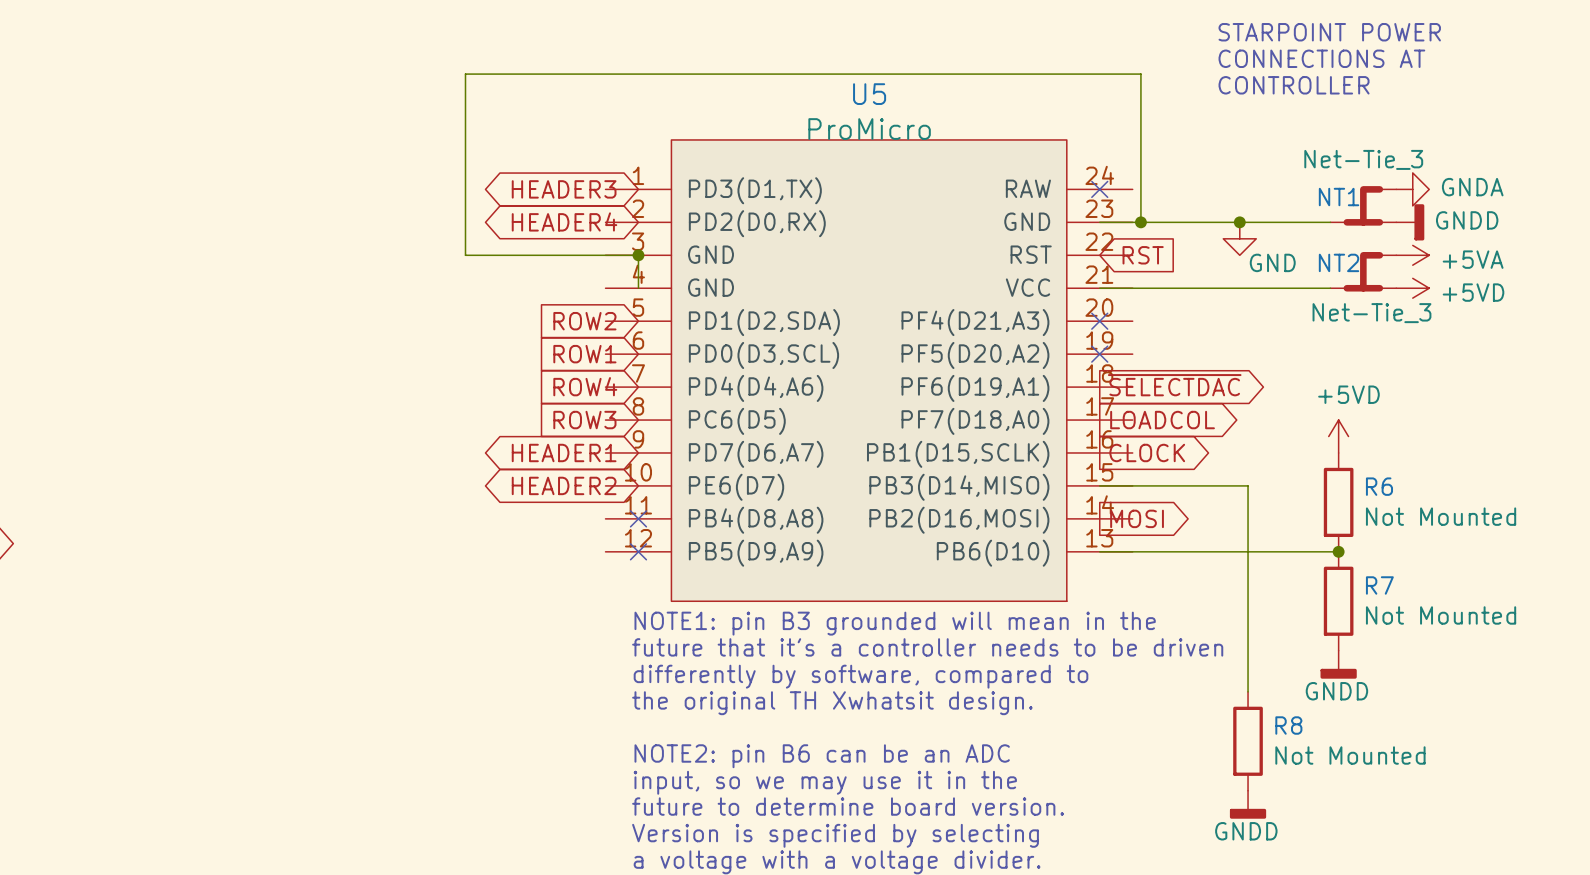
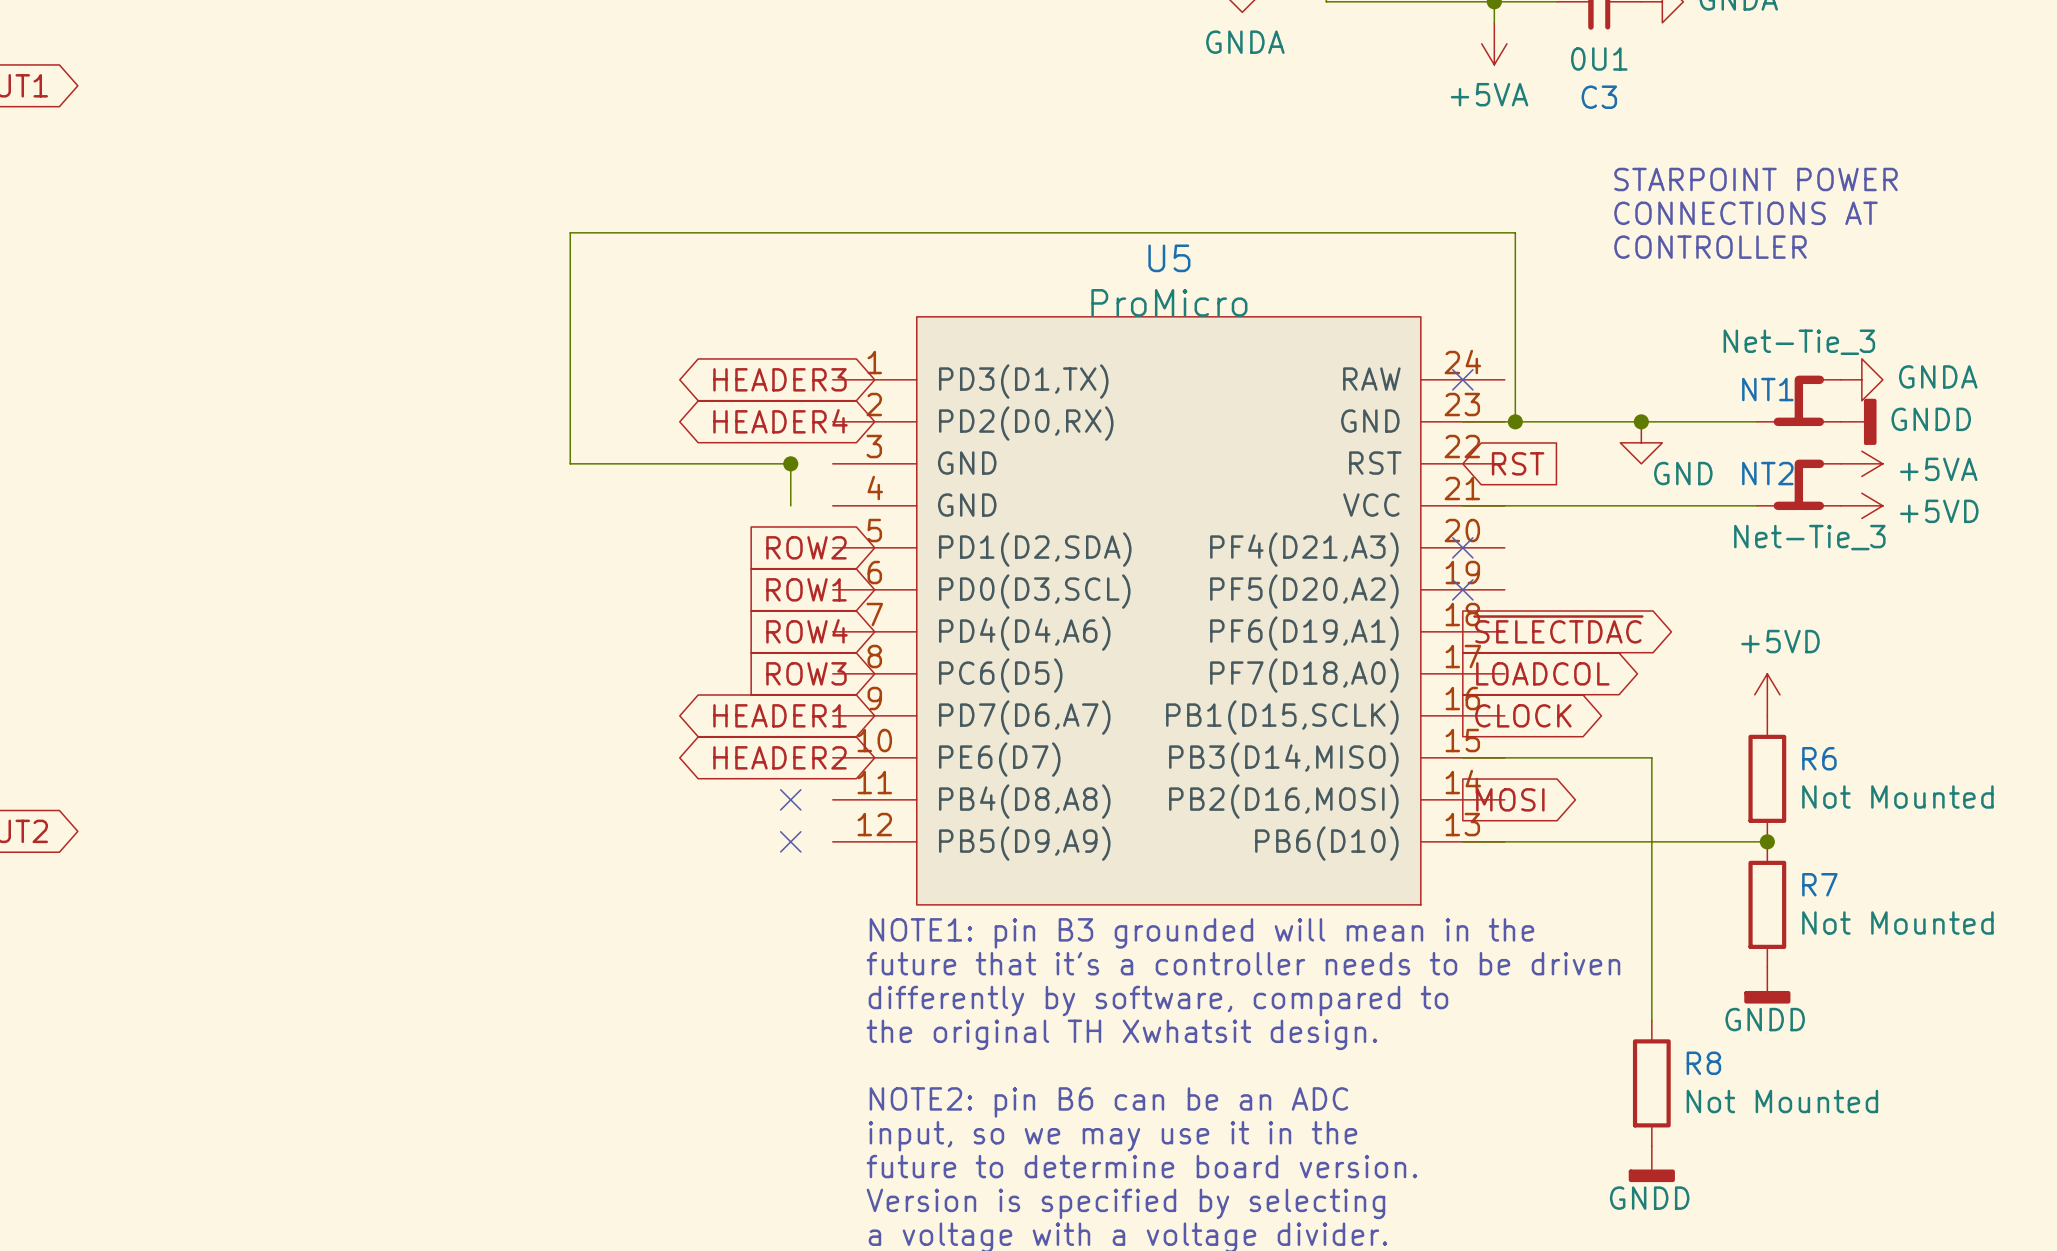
wire: (465, 74) (465, 255) -> (654, 232) (570, 232) (570, 463) (654, 463)
wire: (572, 255) (638, 255) (638, 288) -> (790, 463) (790, 505)
junction position: (638, 255) -> (790, 463)
no-connect mark: none -> (790, 799)
no-connect mark: (638, 518) -> none
no-connect mark: none -> (790, 841)
no-connect mark: (638, 551) -> none

